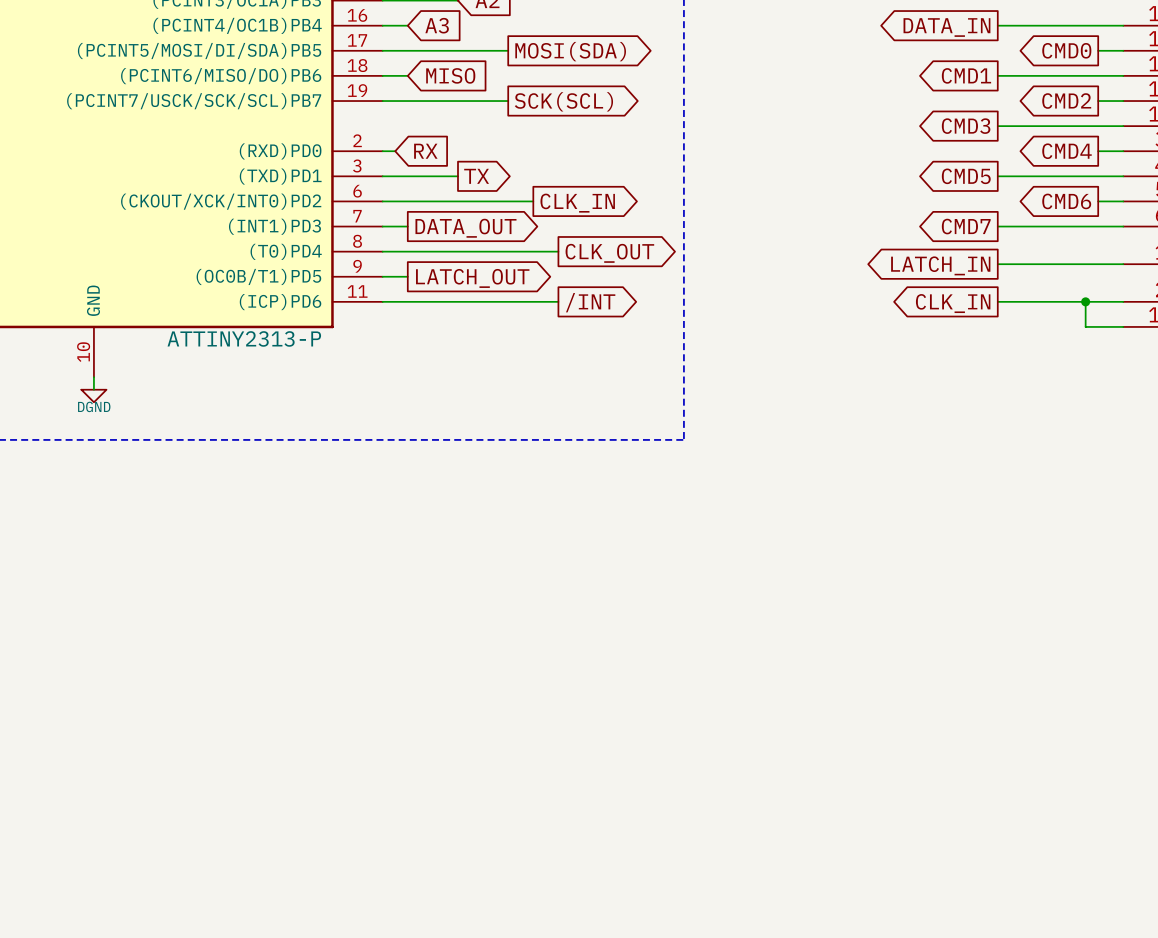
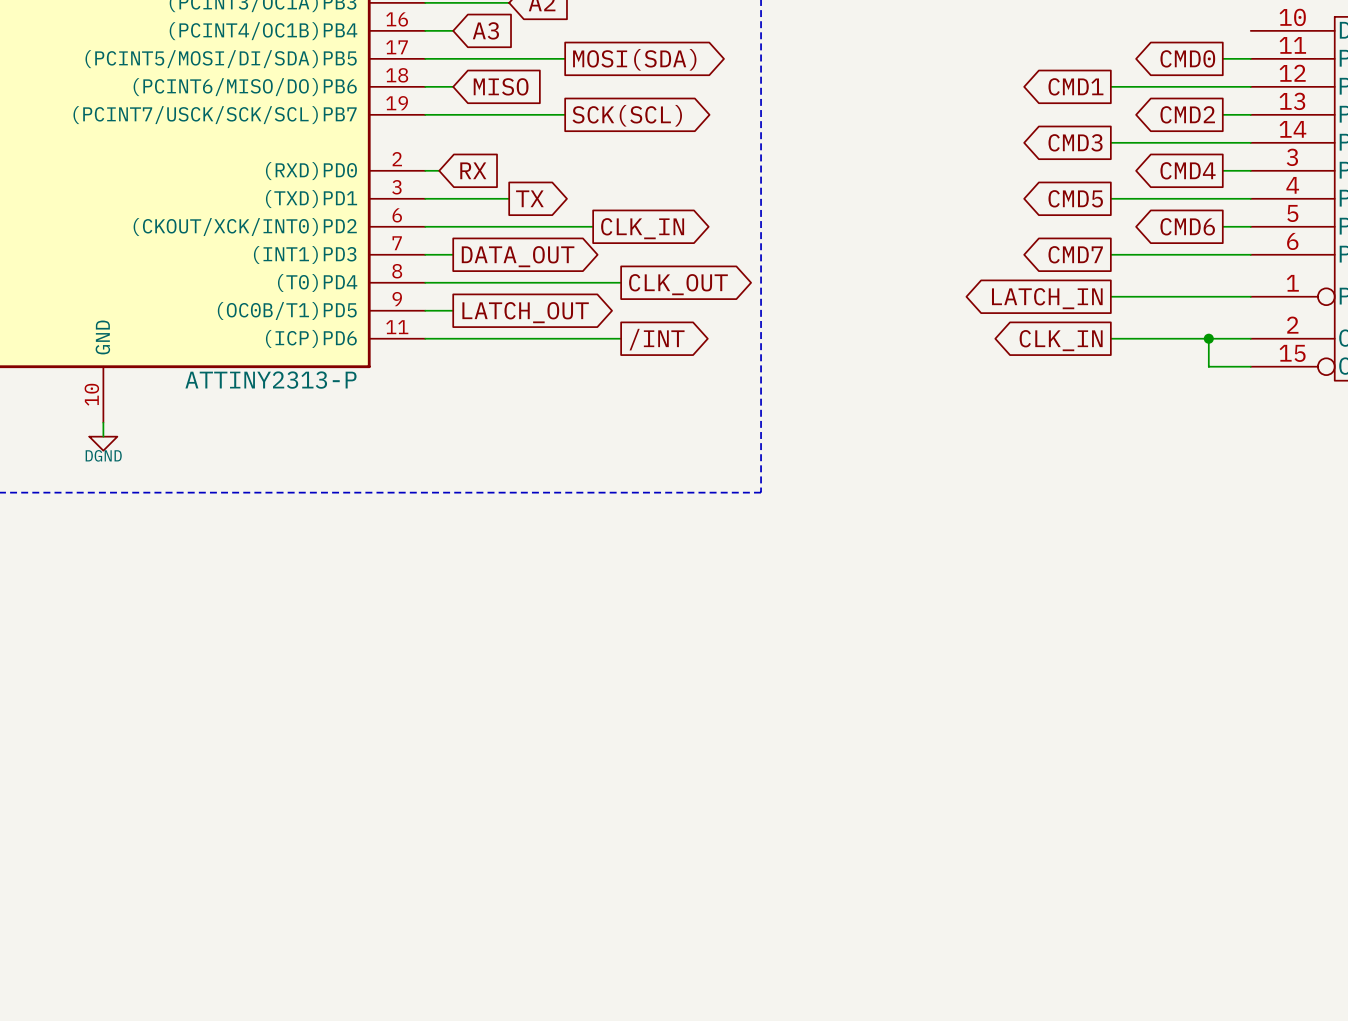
wire: (997, 25) (1123, 25) -> none
global label: DATA_IN (946, 27) -> none

